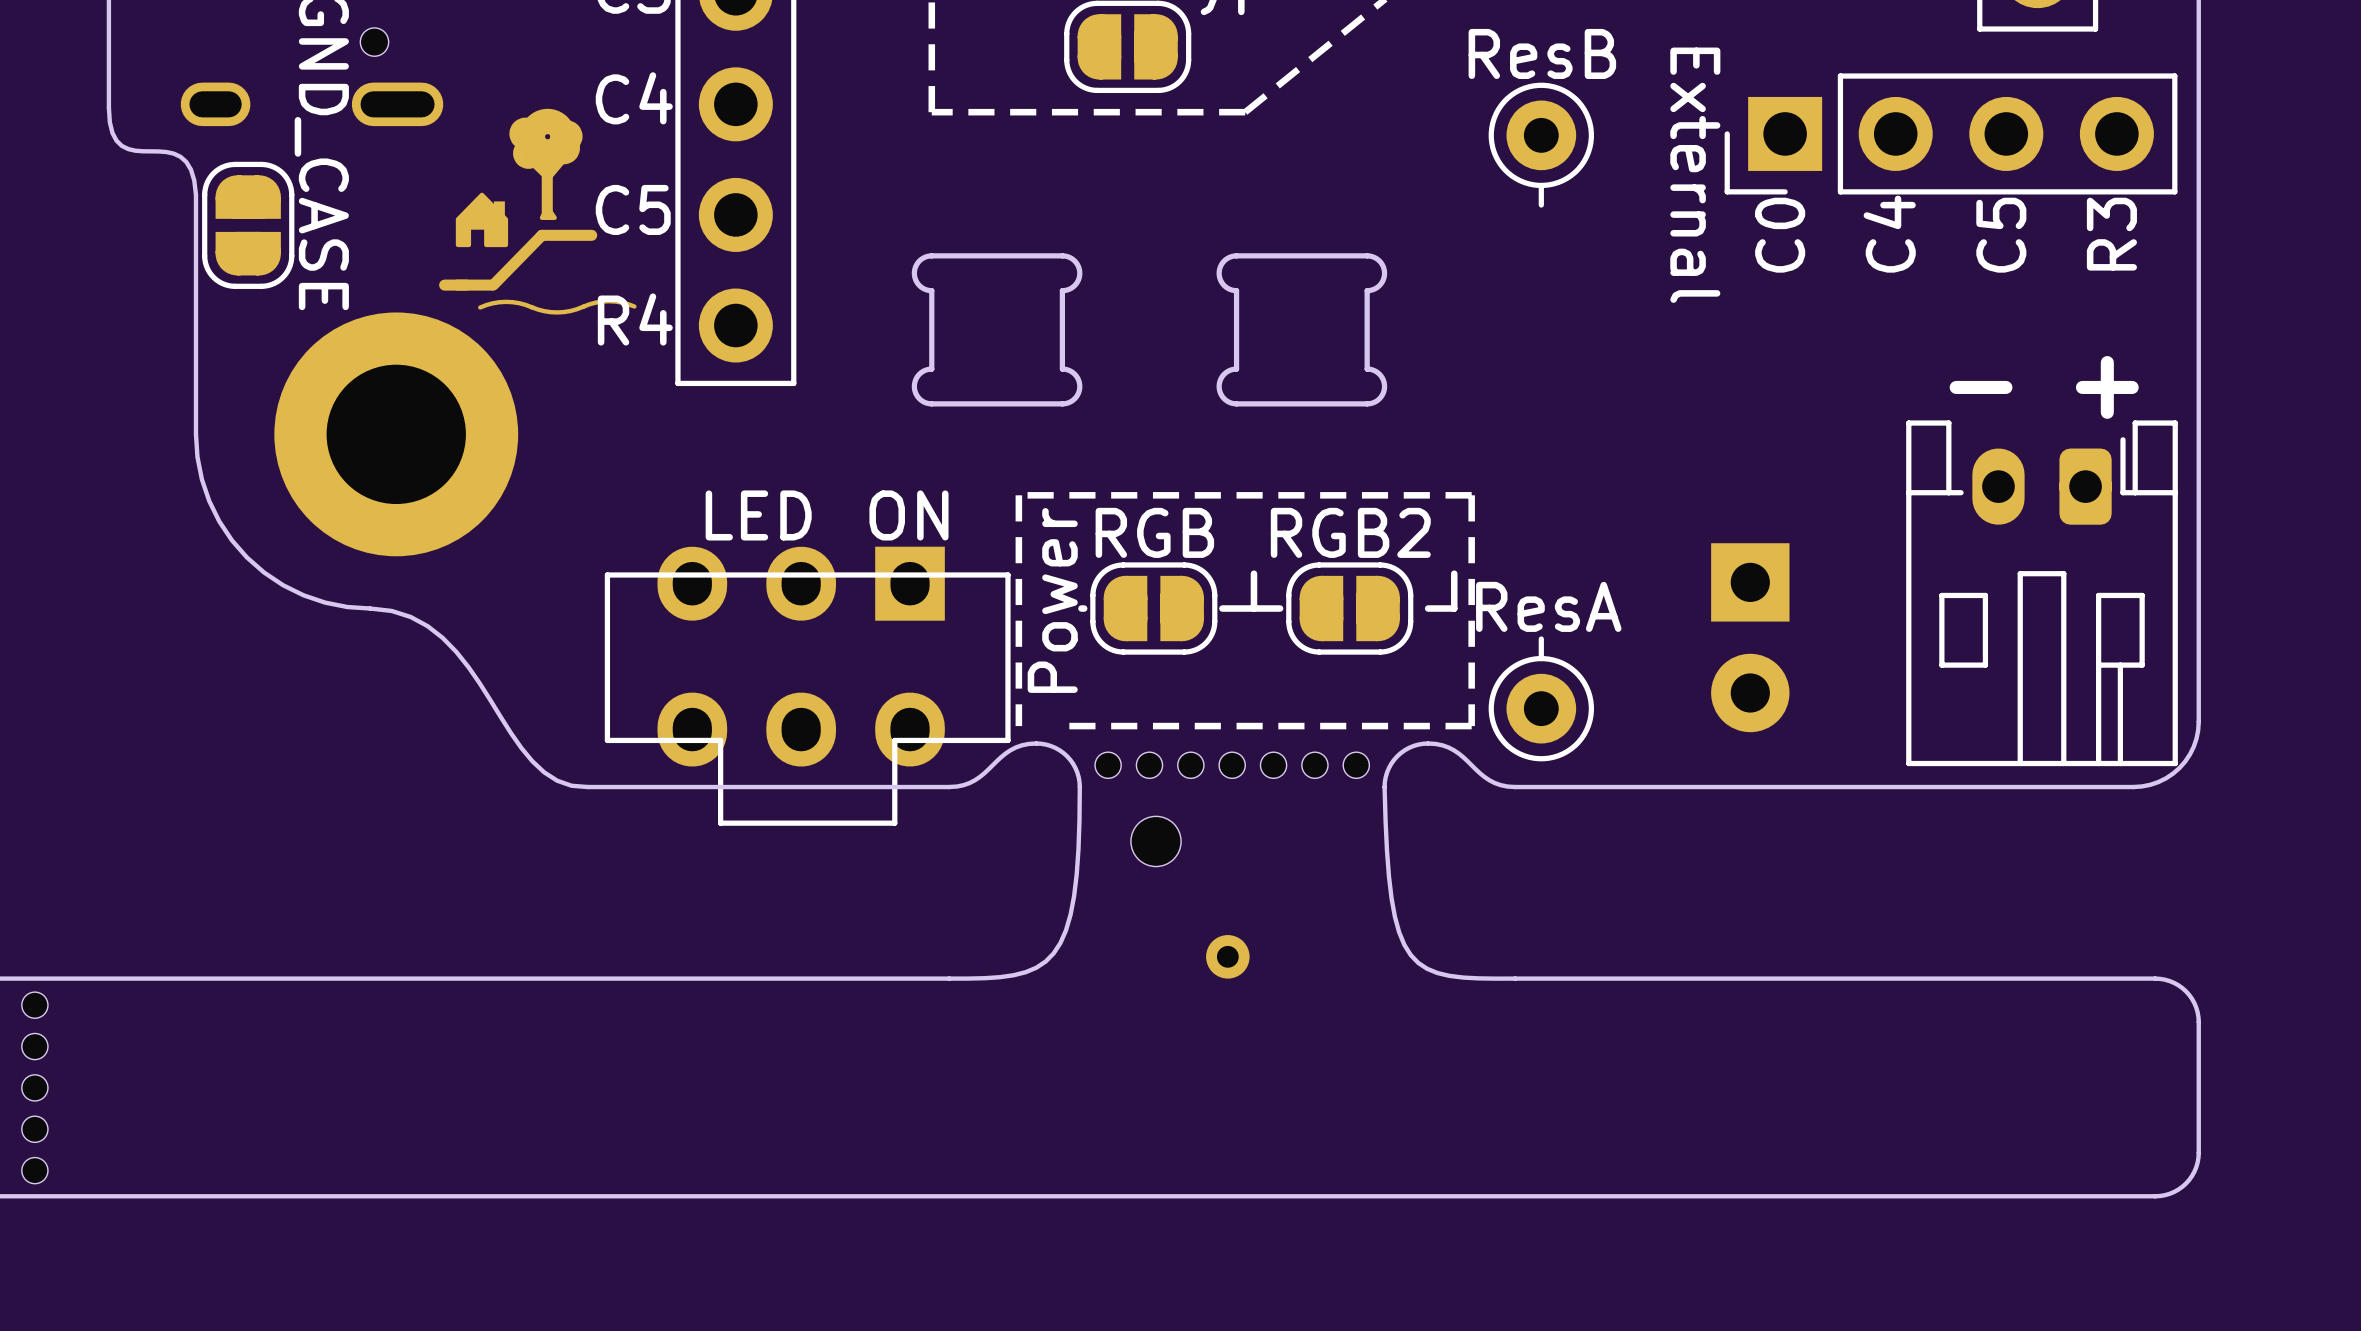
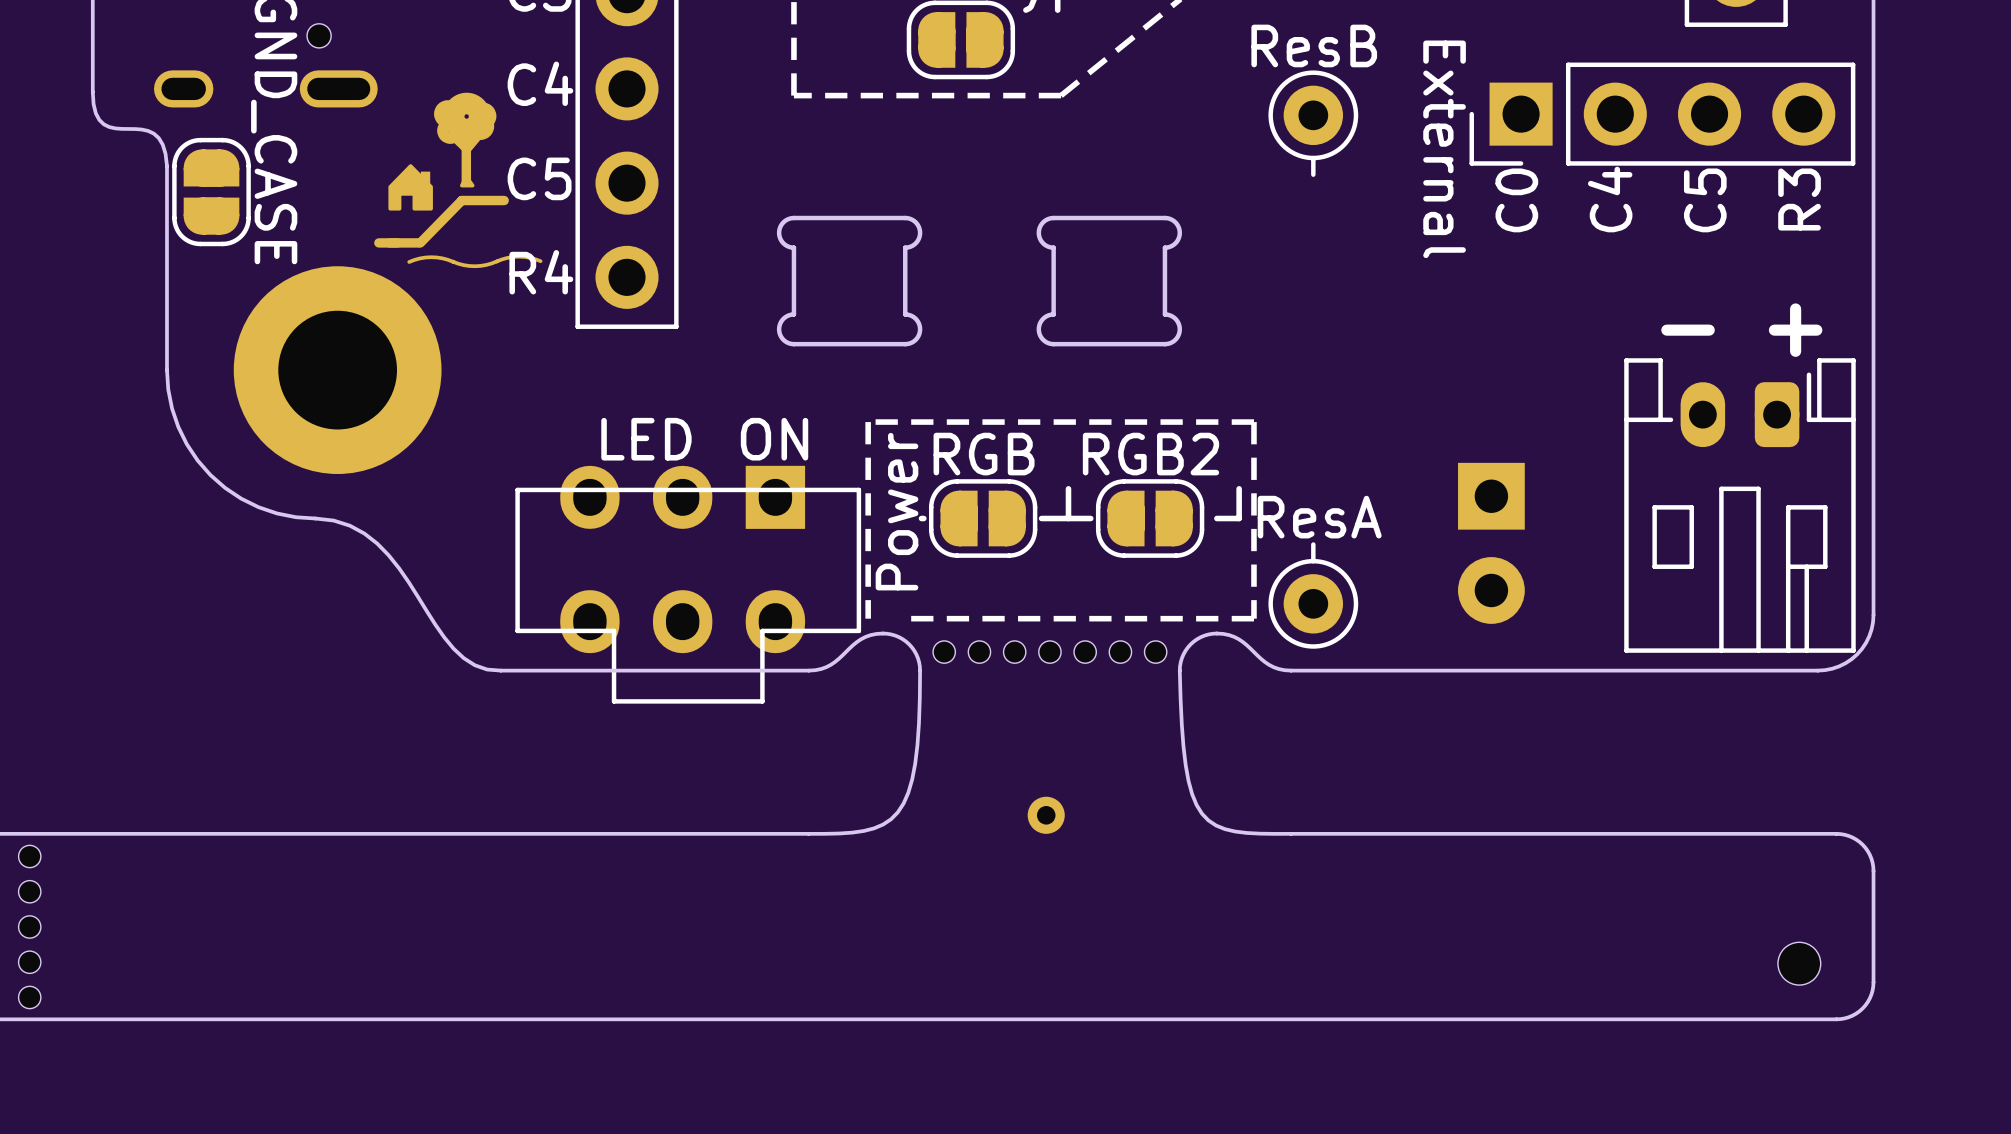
part position: (1156, 841) -> (1799, 963)

